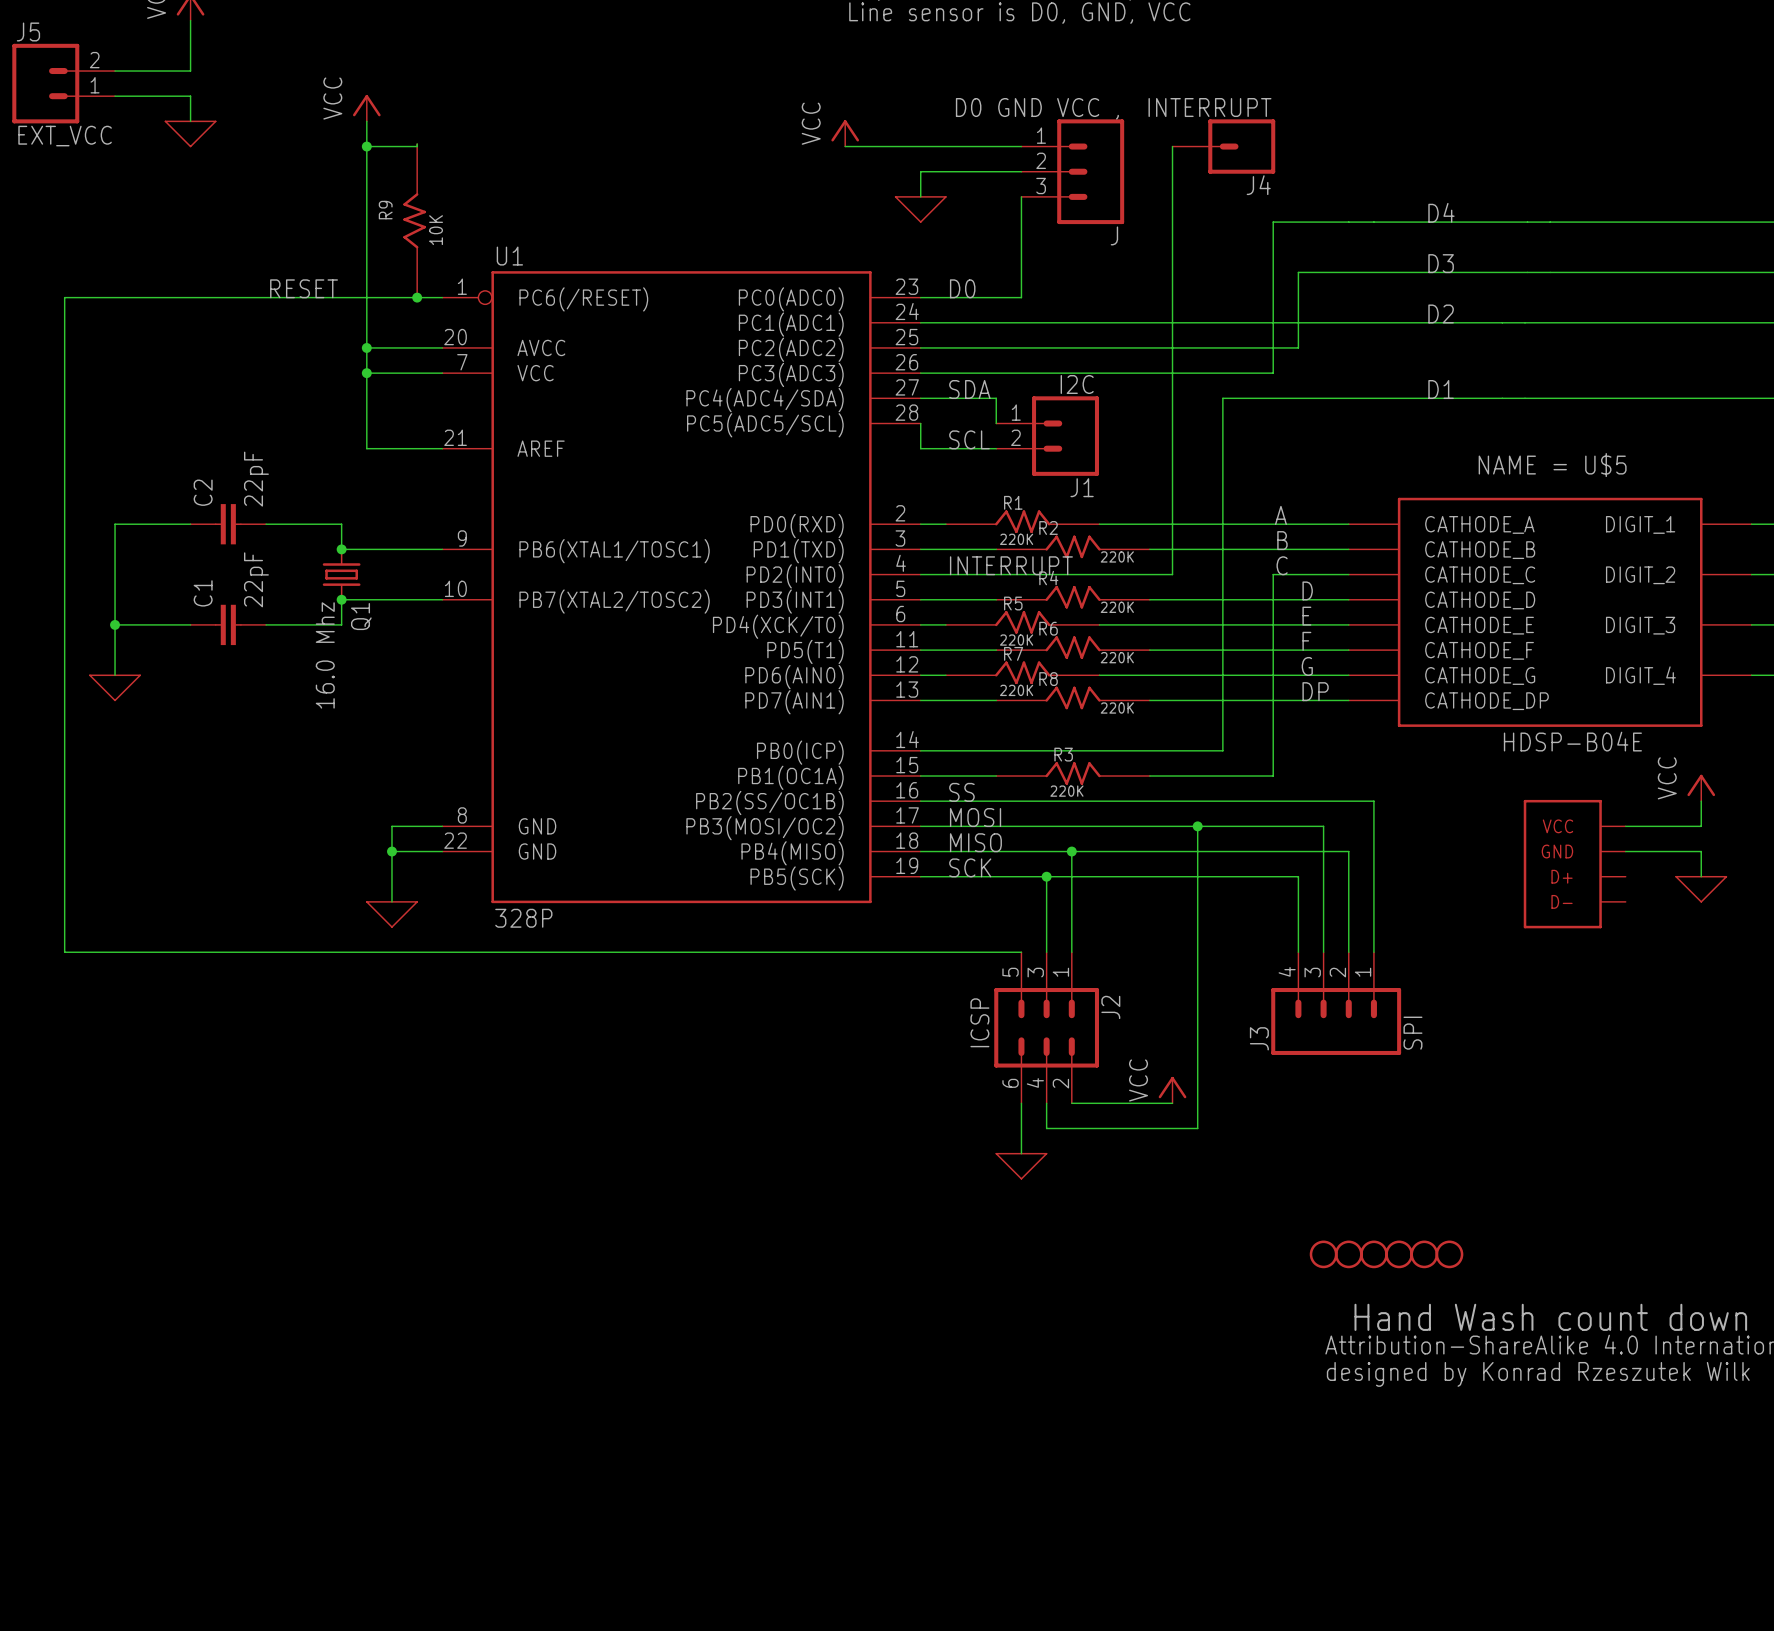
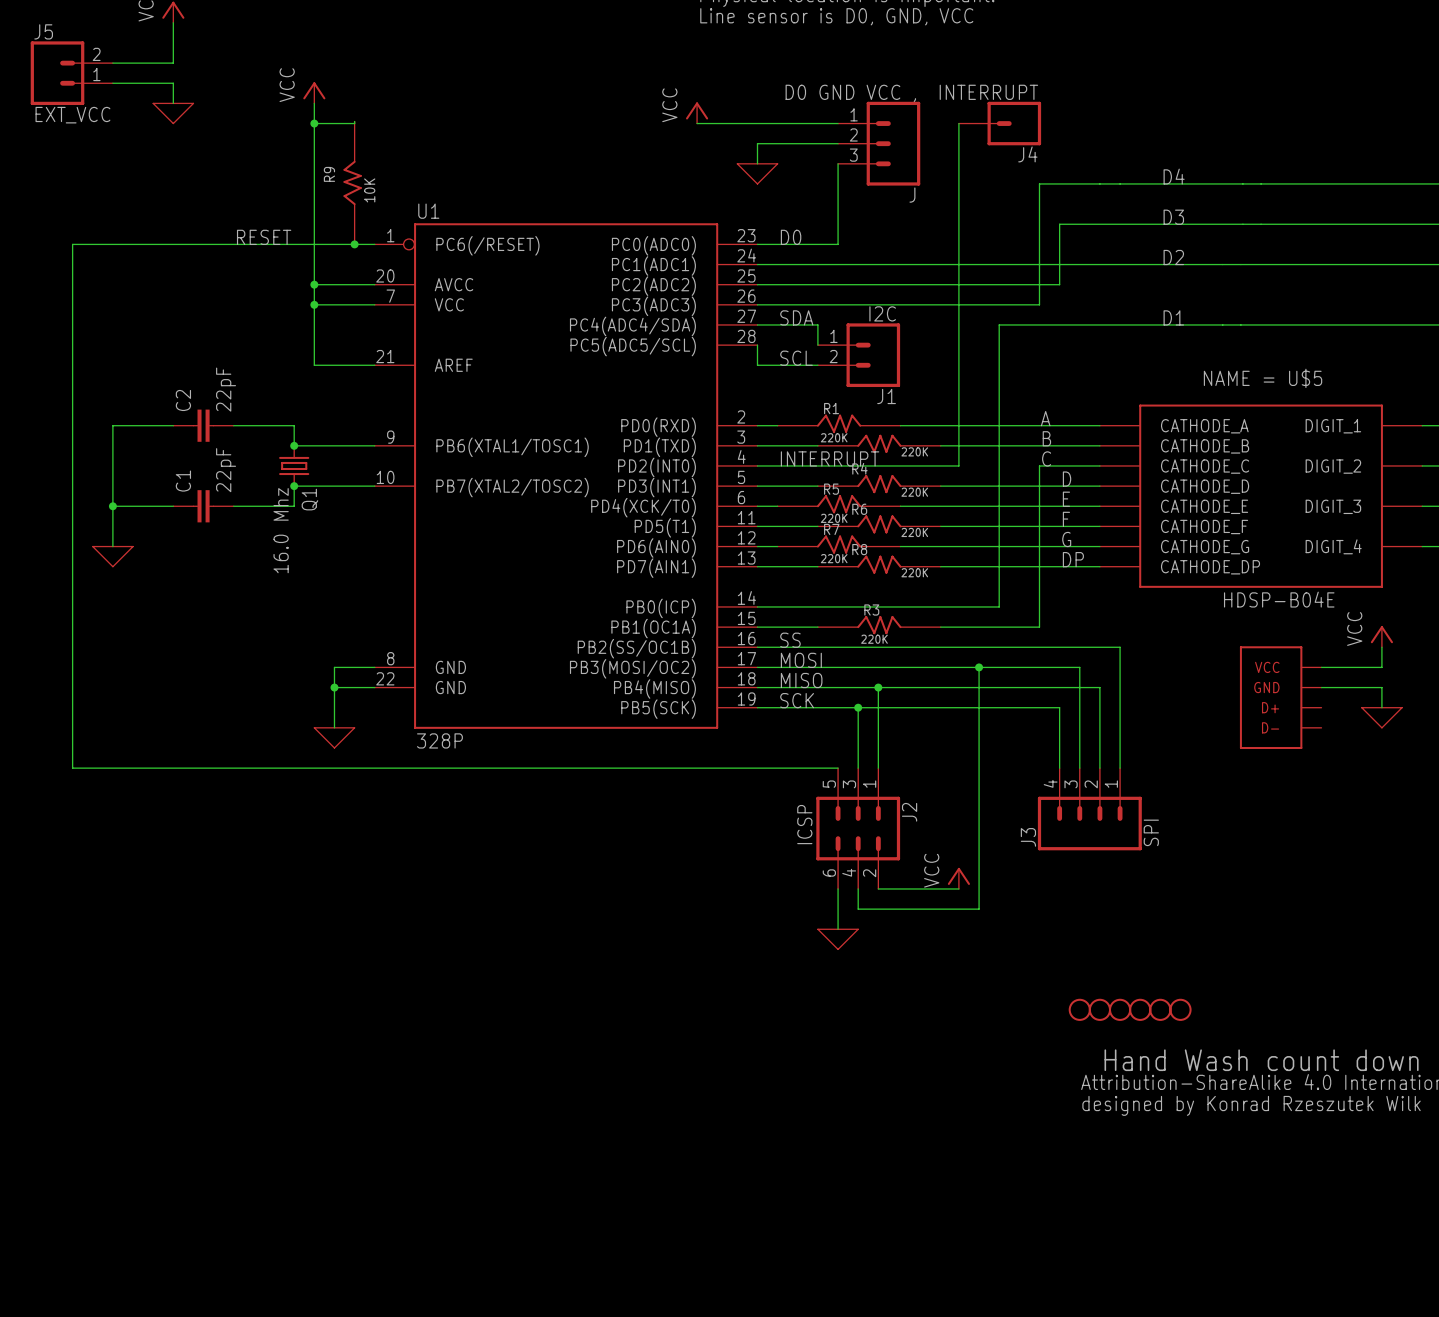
R2 name: R2 (1048, 527) -> none

